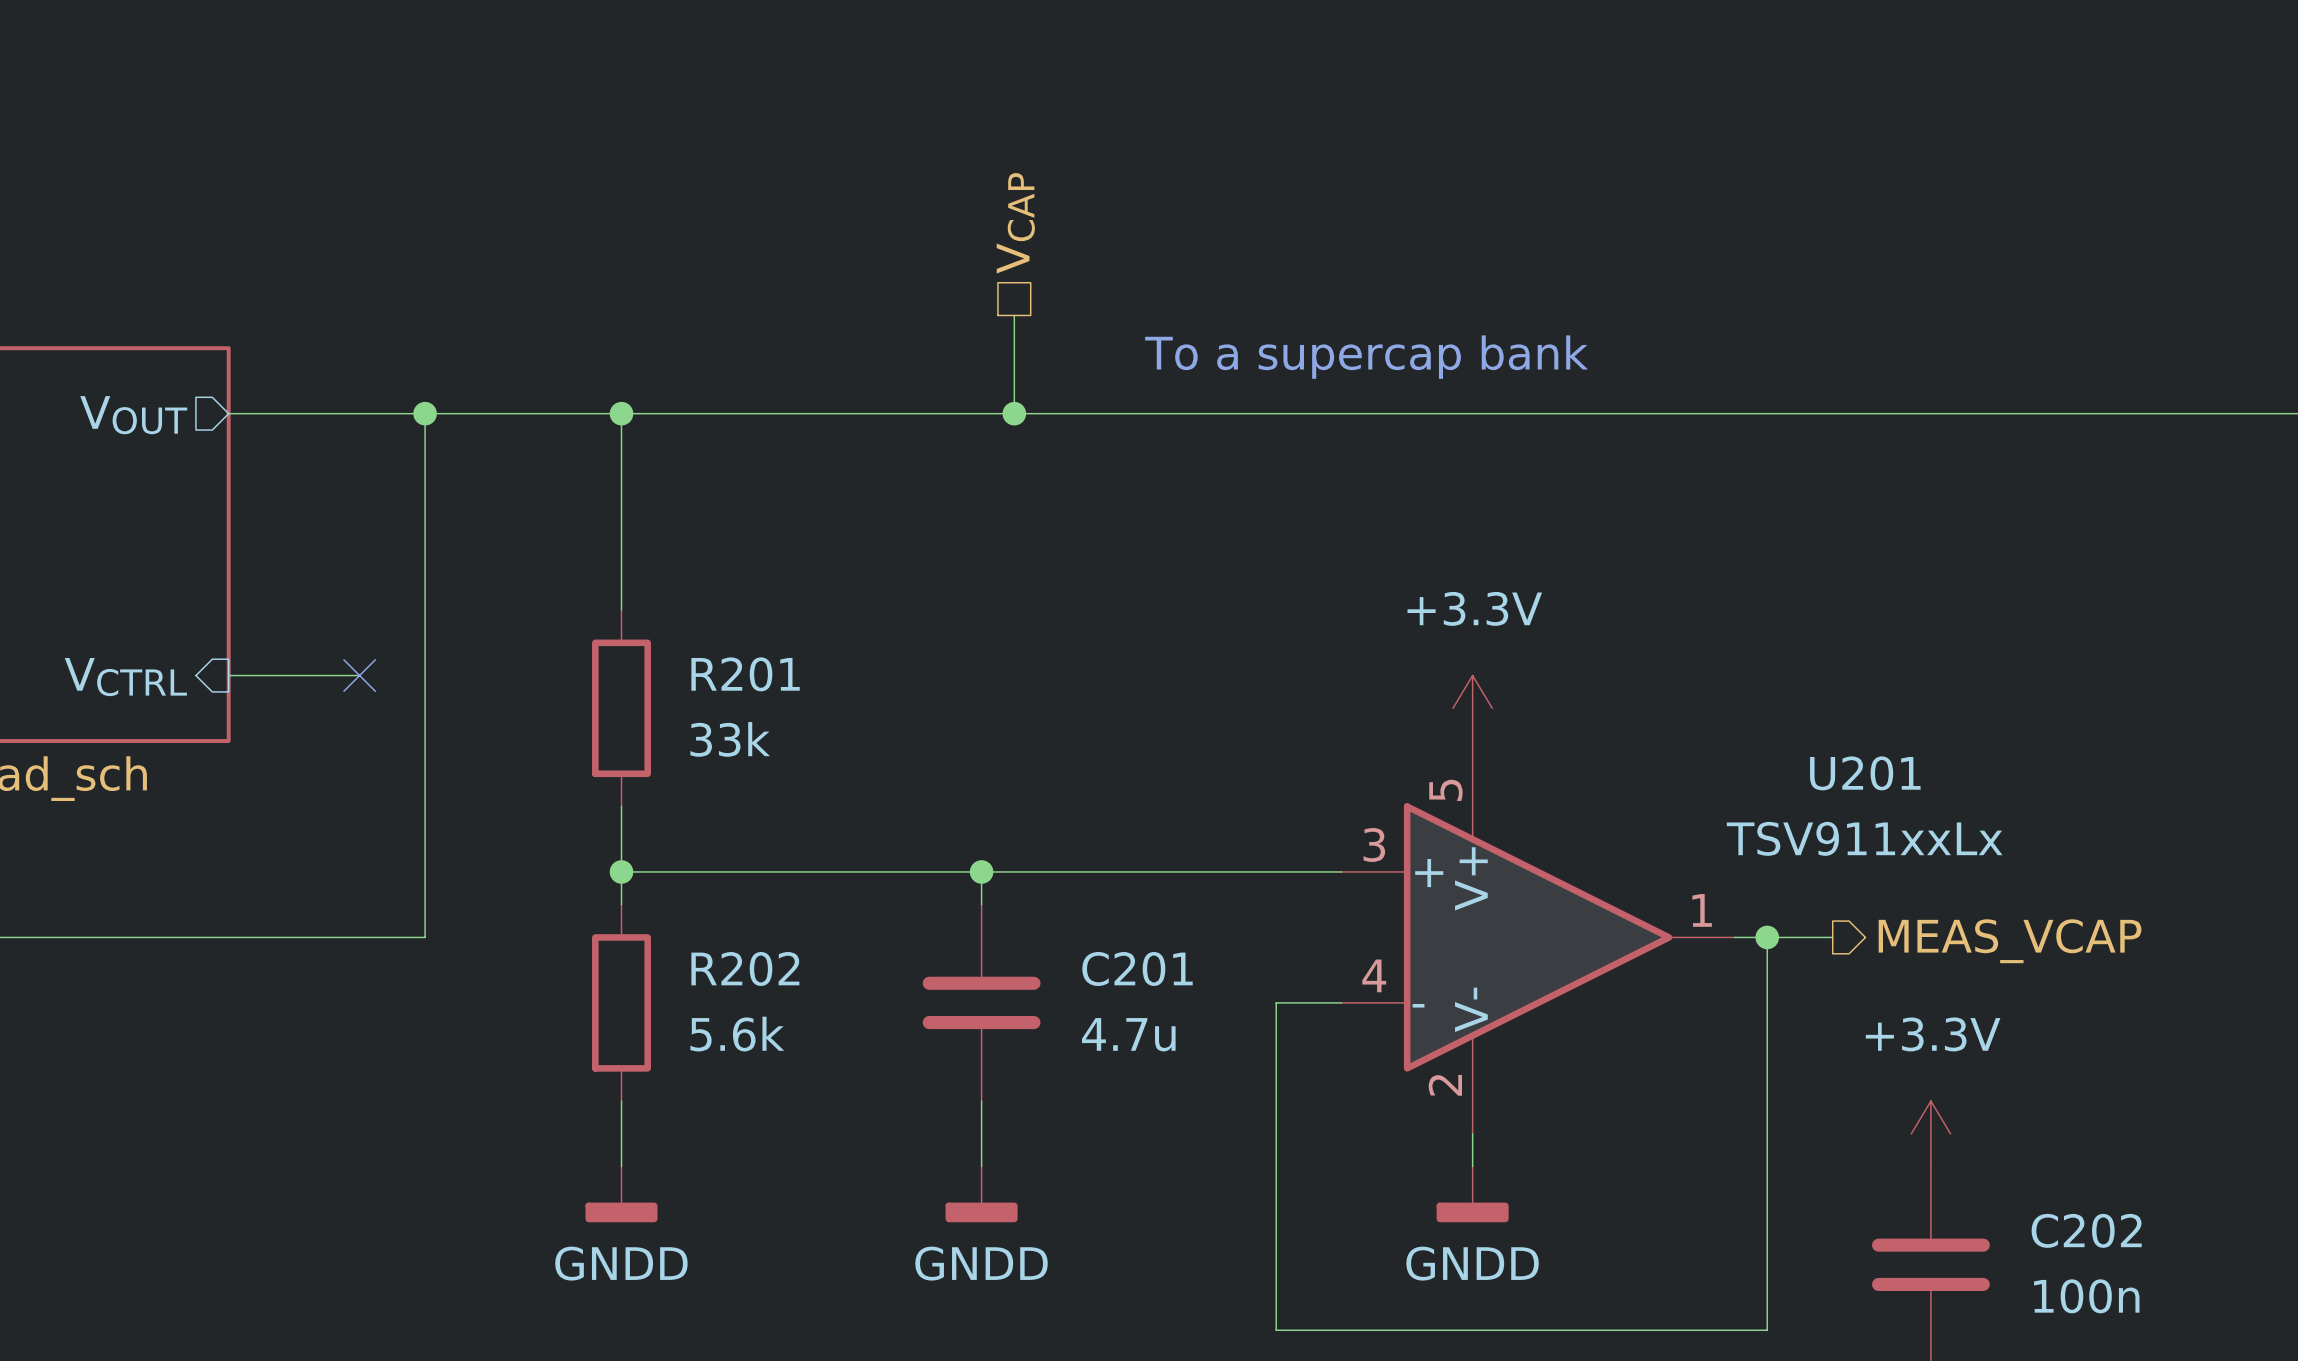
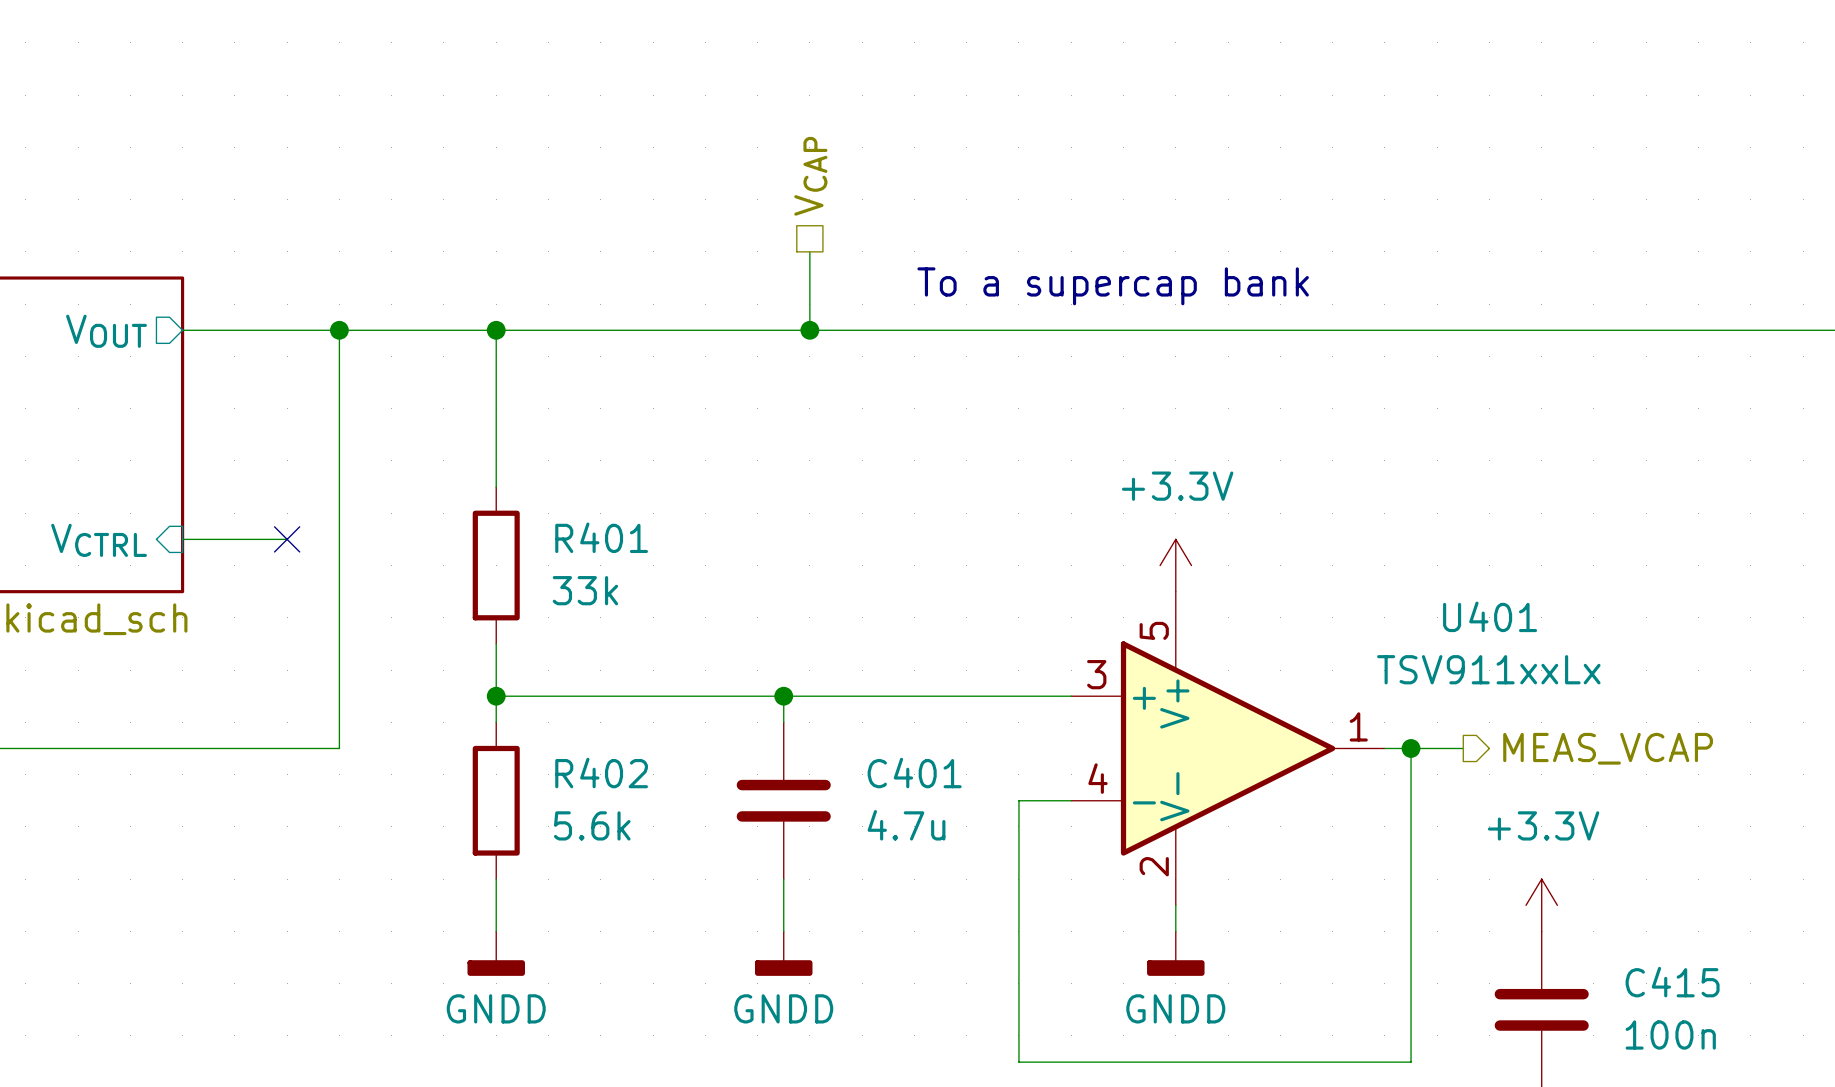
R201 name: R201 (745, 674) -> R401 (601, 537)
U201 name: U201 (1865, 773) -> U401 (1490, 616)
R202 name: R202 (745, 968) -> R402 (601, 773)
C201 name: C201 (1137, 968) -> C401 (914, 773)
C202 name: C202 (2086, 1230) -> C415 (1672, 982)

